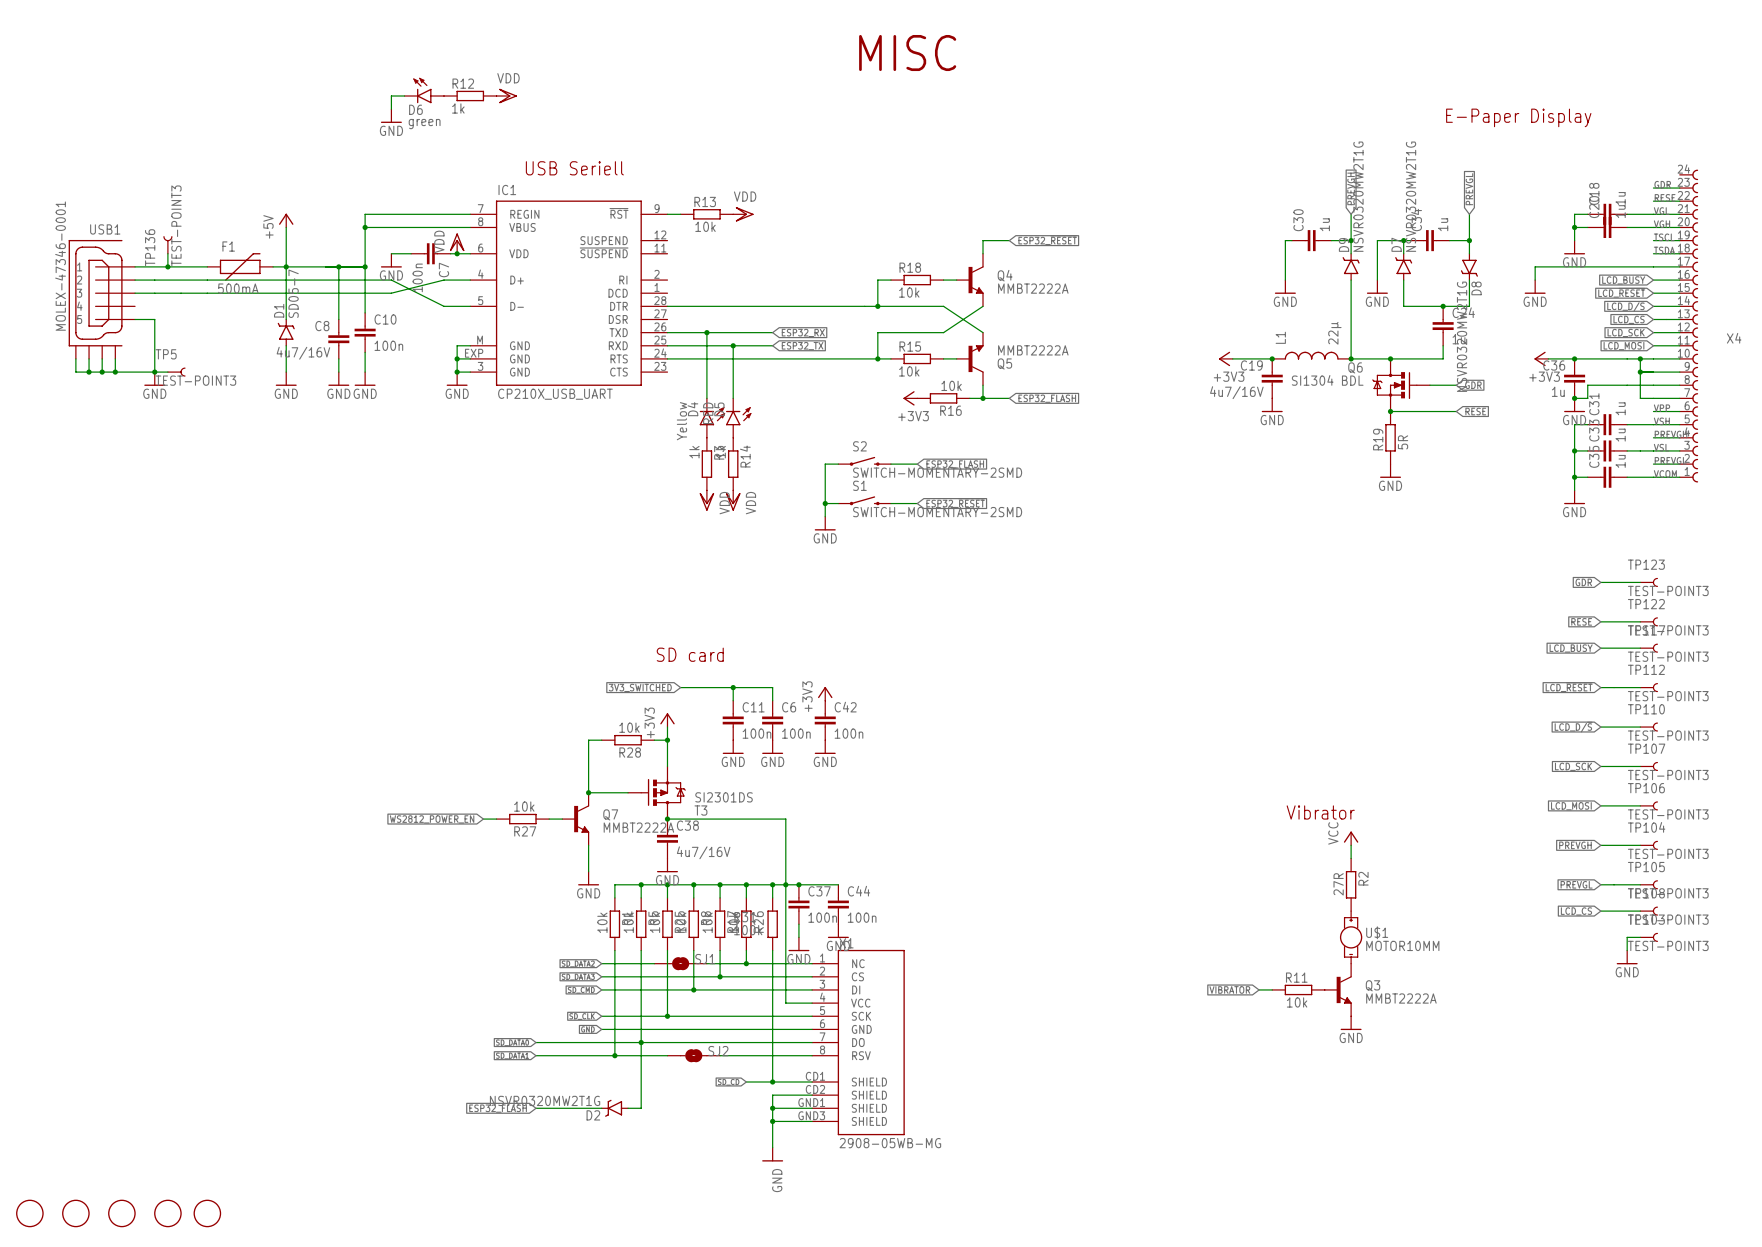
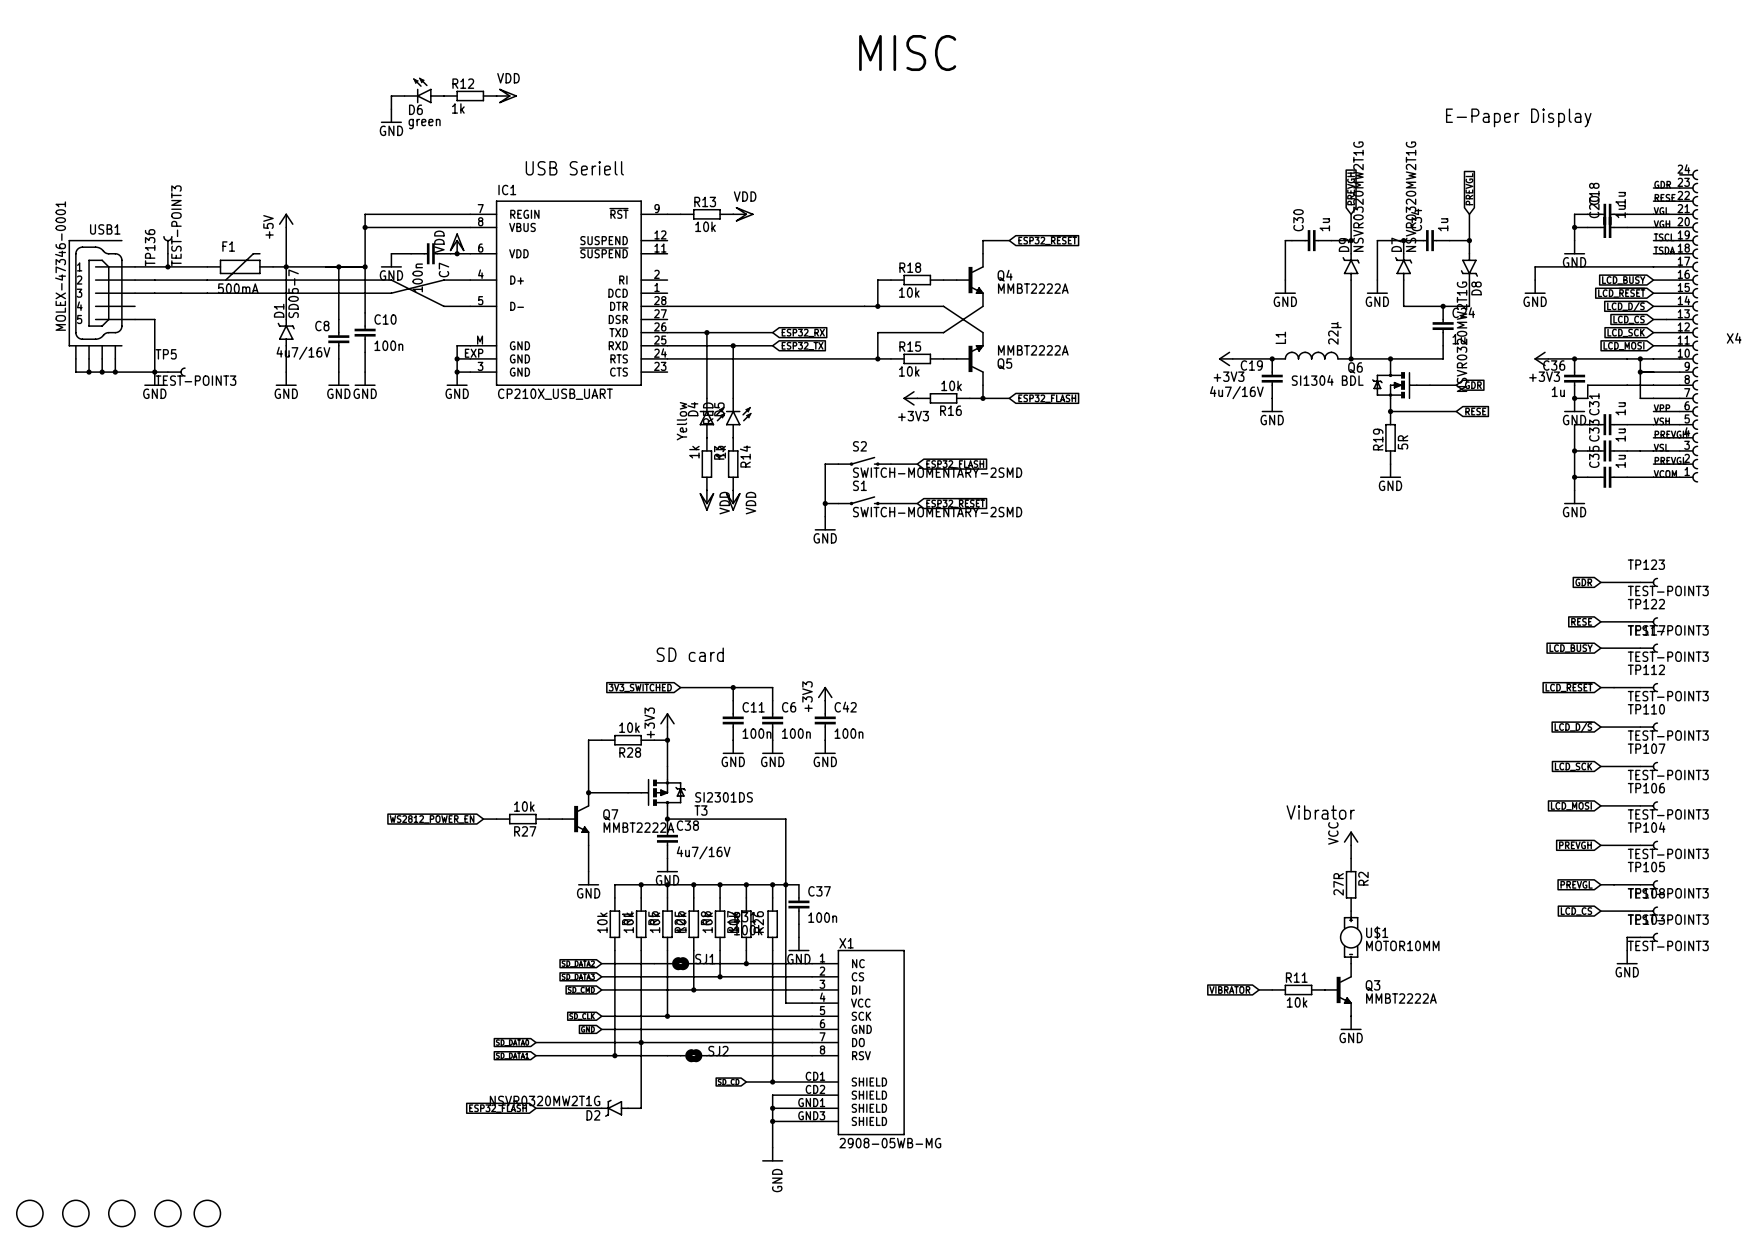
wire: (798, 884) (838, 884) -> none
junction: (798, 884) -> none
C44: 100n (838, 904) -> none
power symbol: GND (838, 931) -> none

